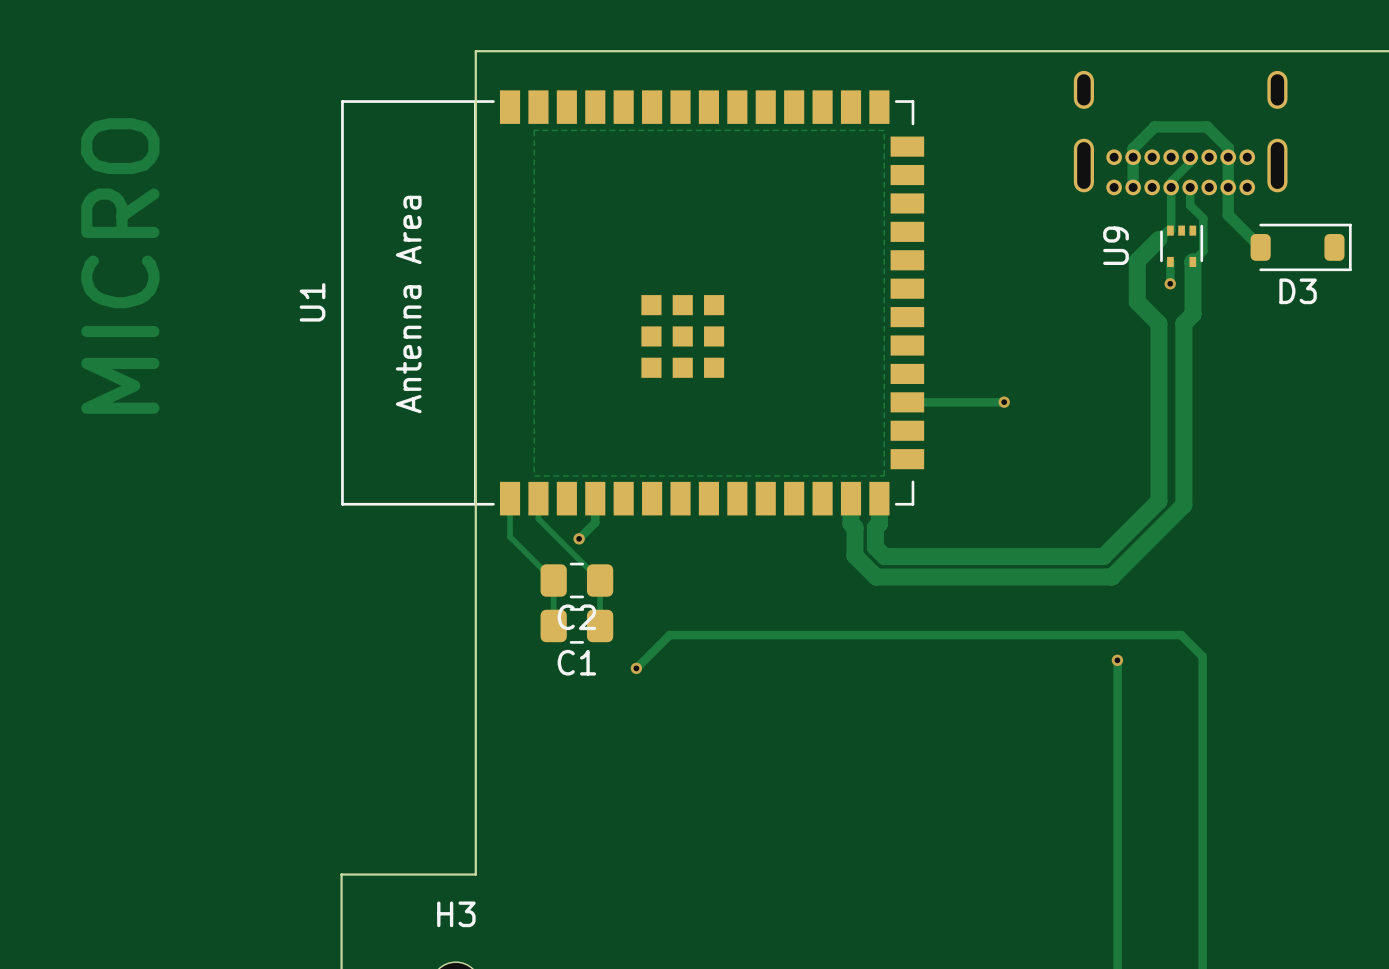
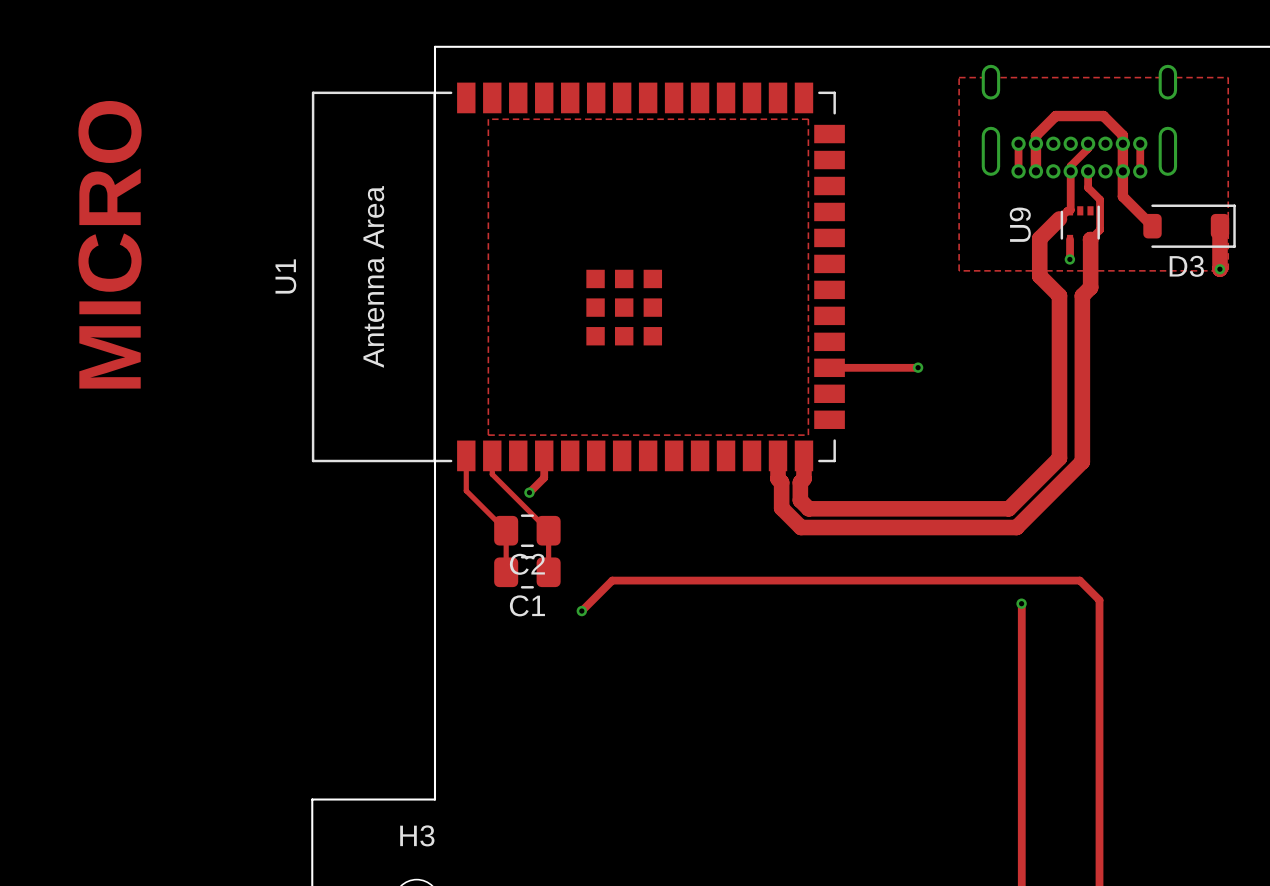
zone outline: none -> (959, 77) (1228, 77) (1228, 270) (959, 270) (959, 77)
track: none -> (1018, 143) (1018, 171)
track: none -> (1140, 143) (1140, 171)
track: none -> (1220, 226) (1220, 269)
via: none -> (1219, 269)

